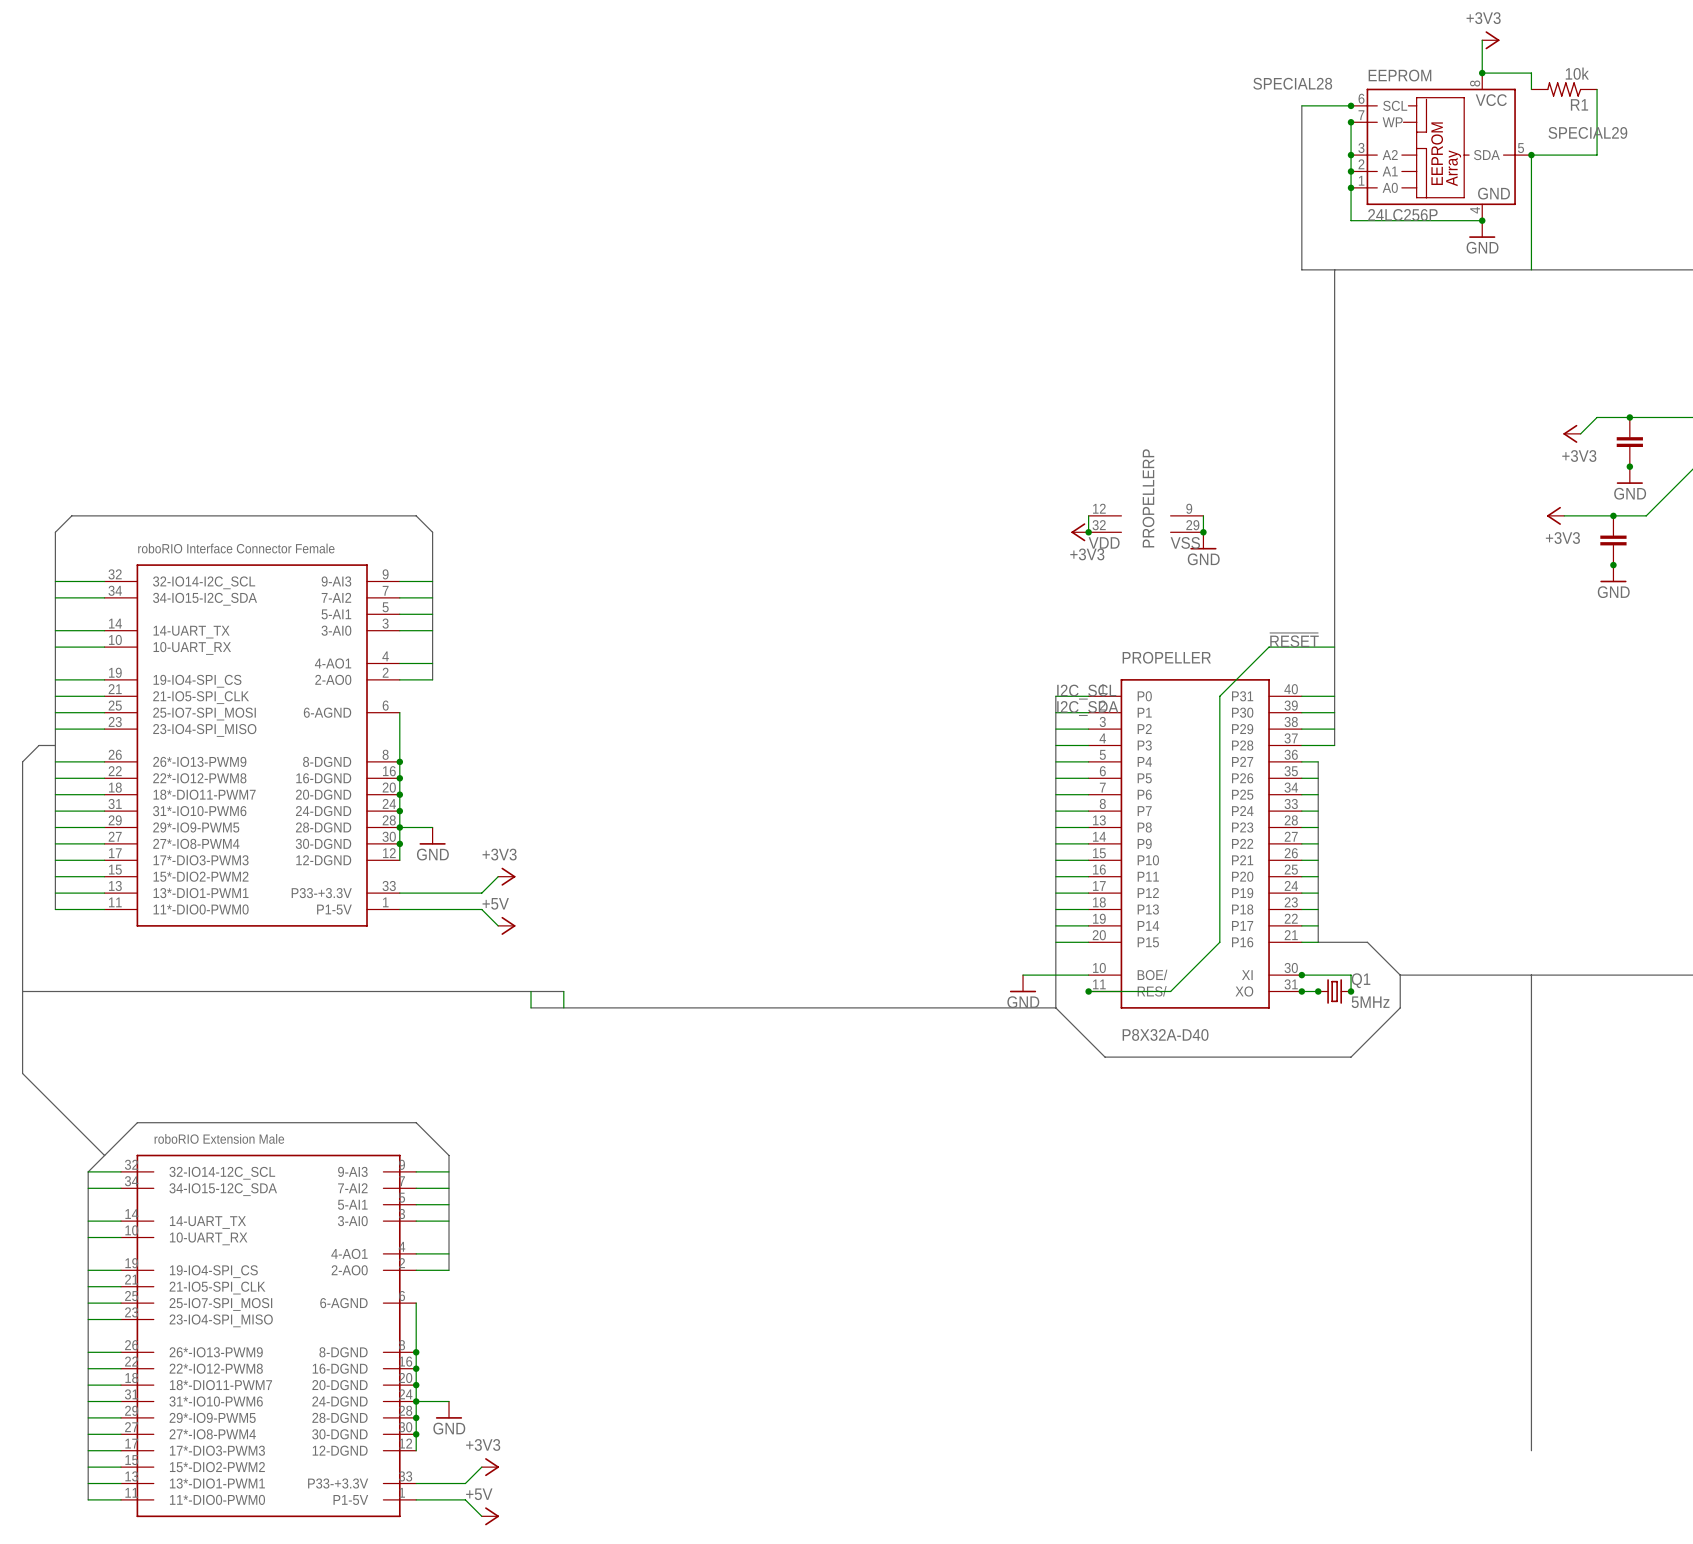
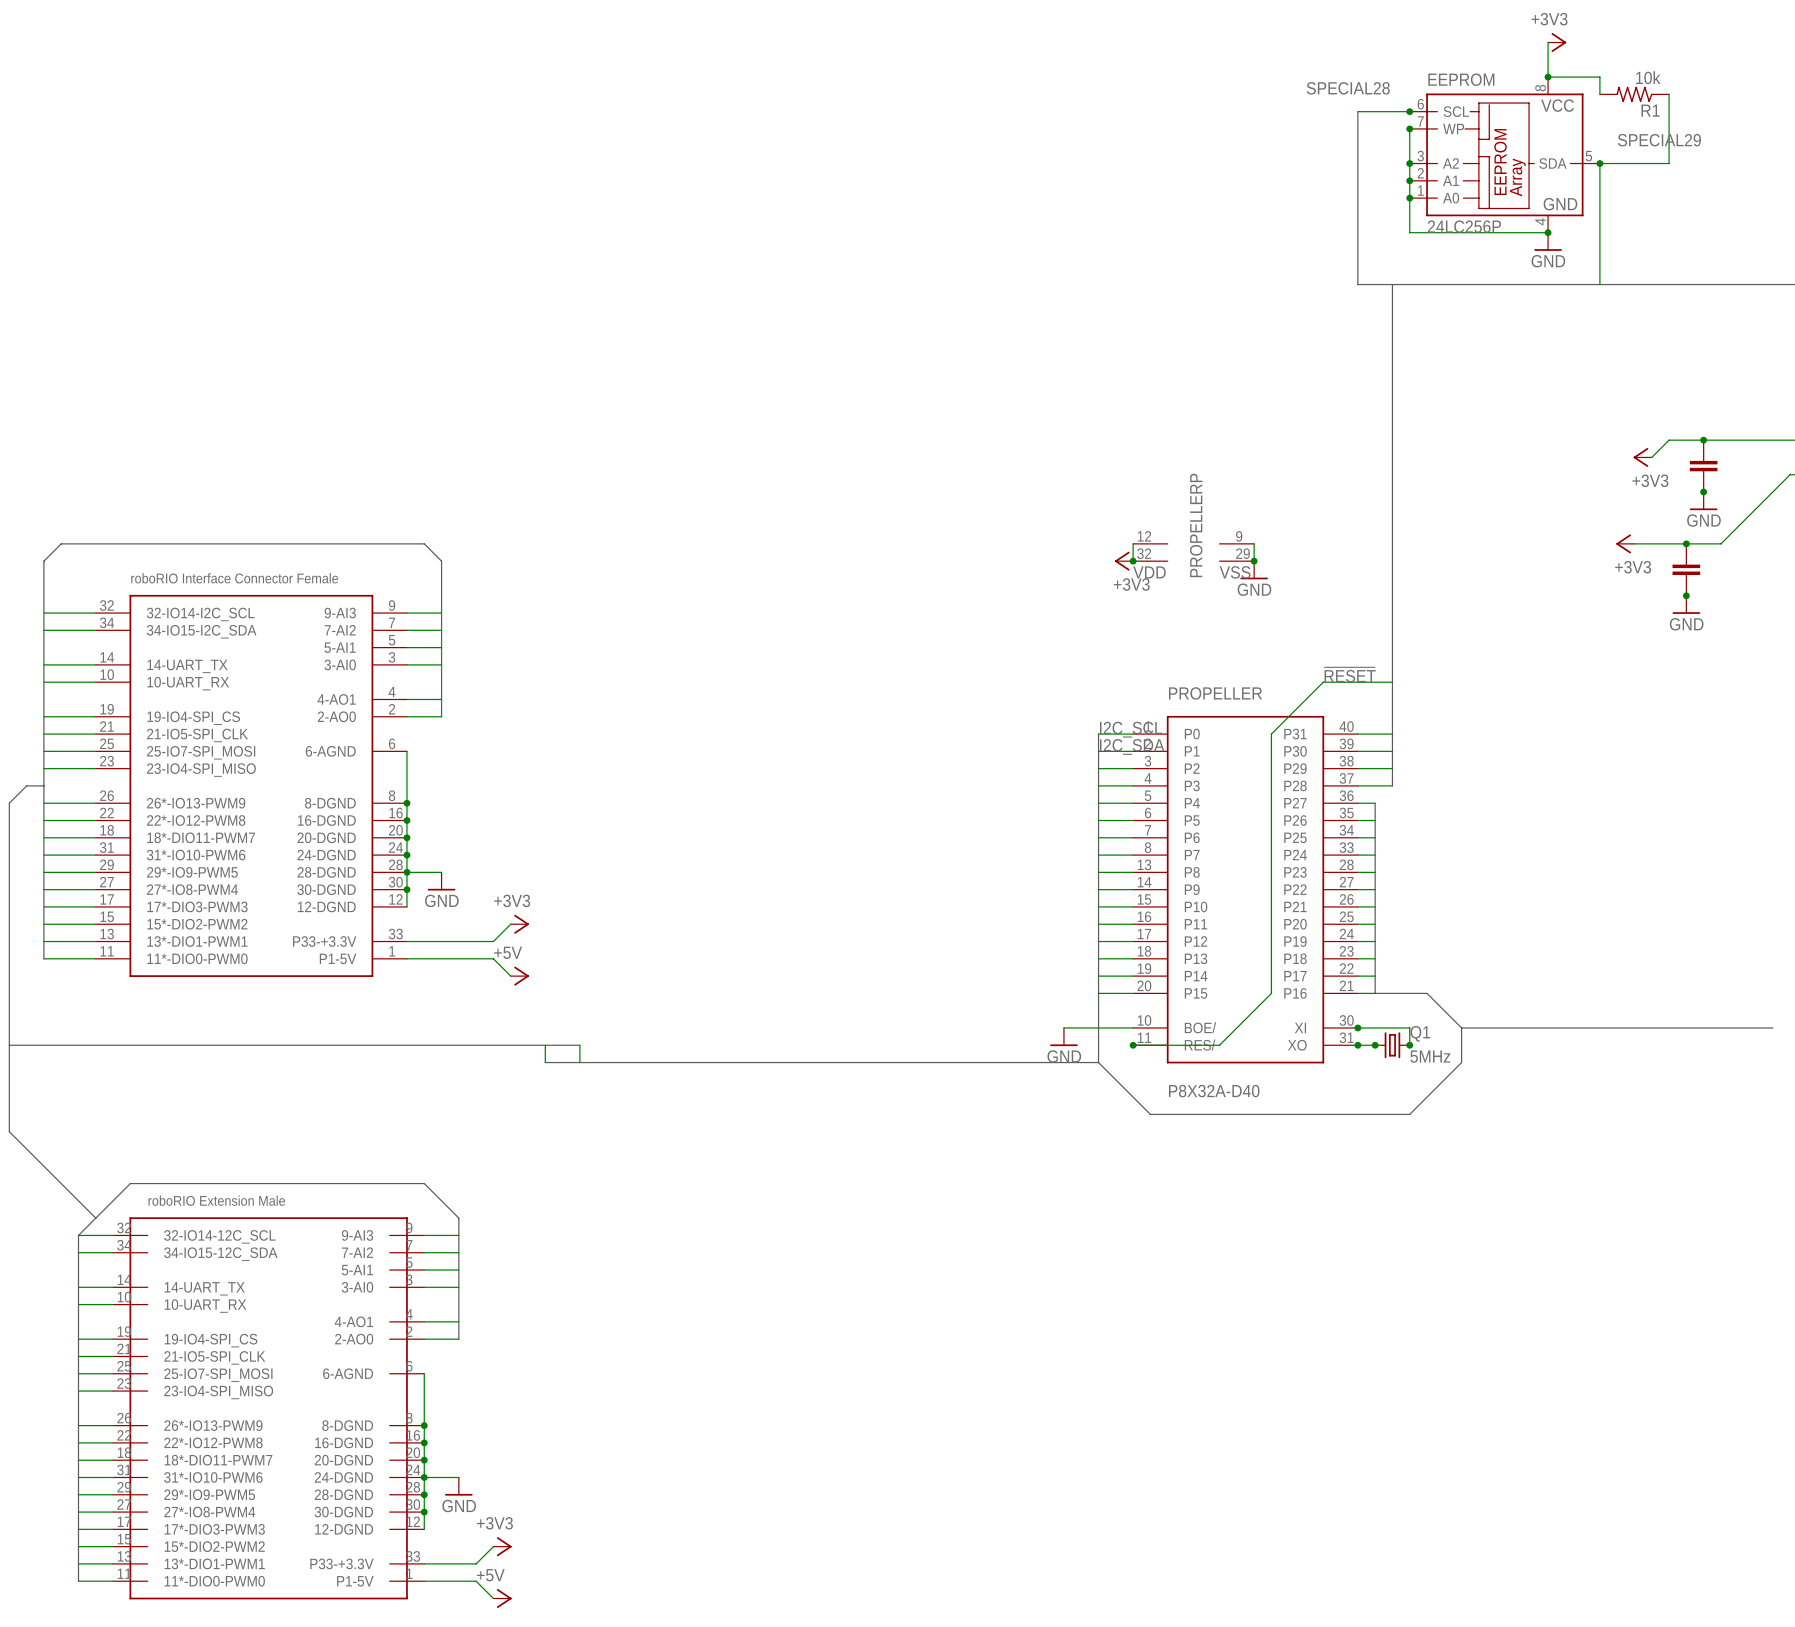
bus: (1531, 975) (1531, 1450) -> none

